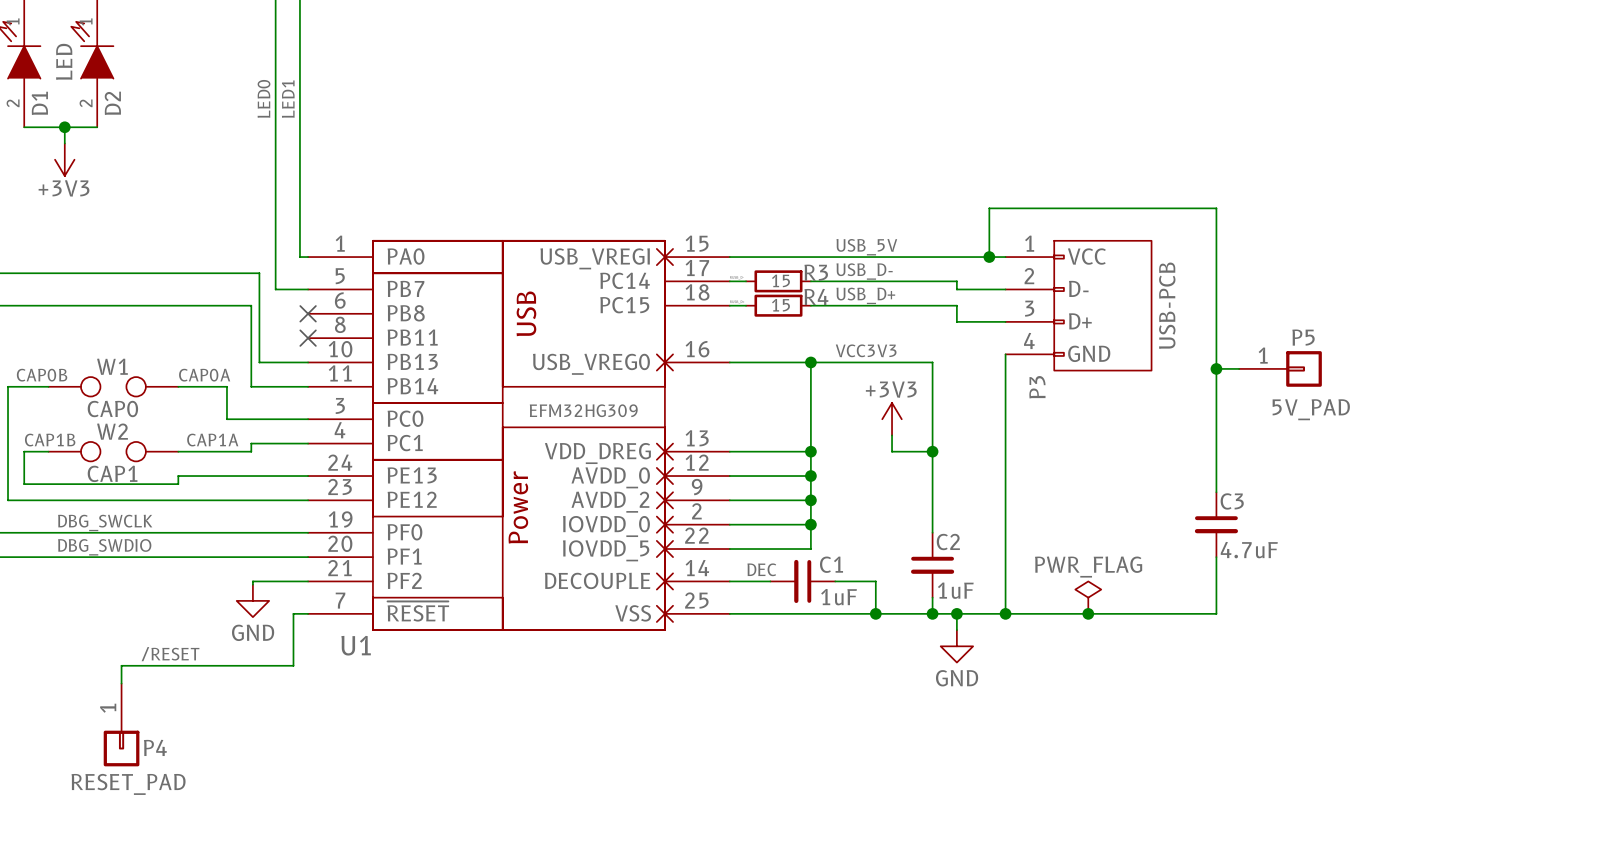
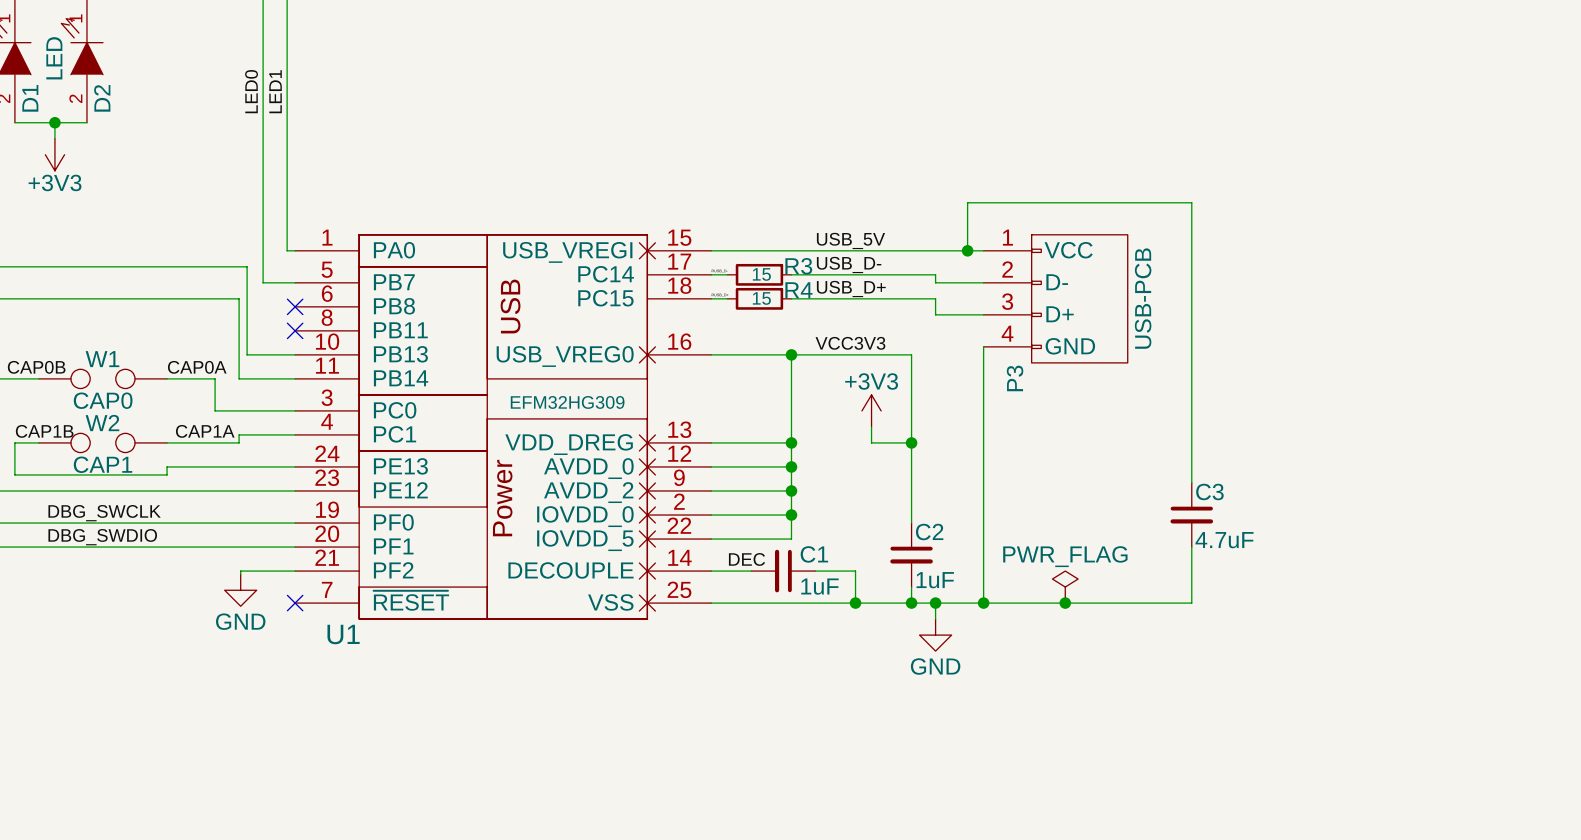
wire: (1216, 368) (1239, 368) -> none
junction: (1216, 368) -> none
P5: 5V_PAD (1280, 368) -> none
wire: (308, 613) (293, 613) (293, 665) (121, 665) (121, 683) -> none
no-connect mark: none -> (295, 603)
label: /RESET (170, 654) -> none
P4: RESET_PAD (121, 724) -> none

